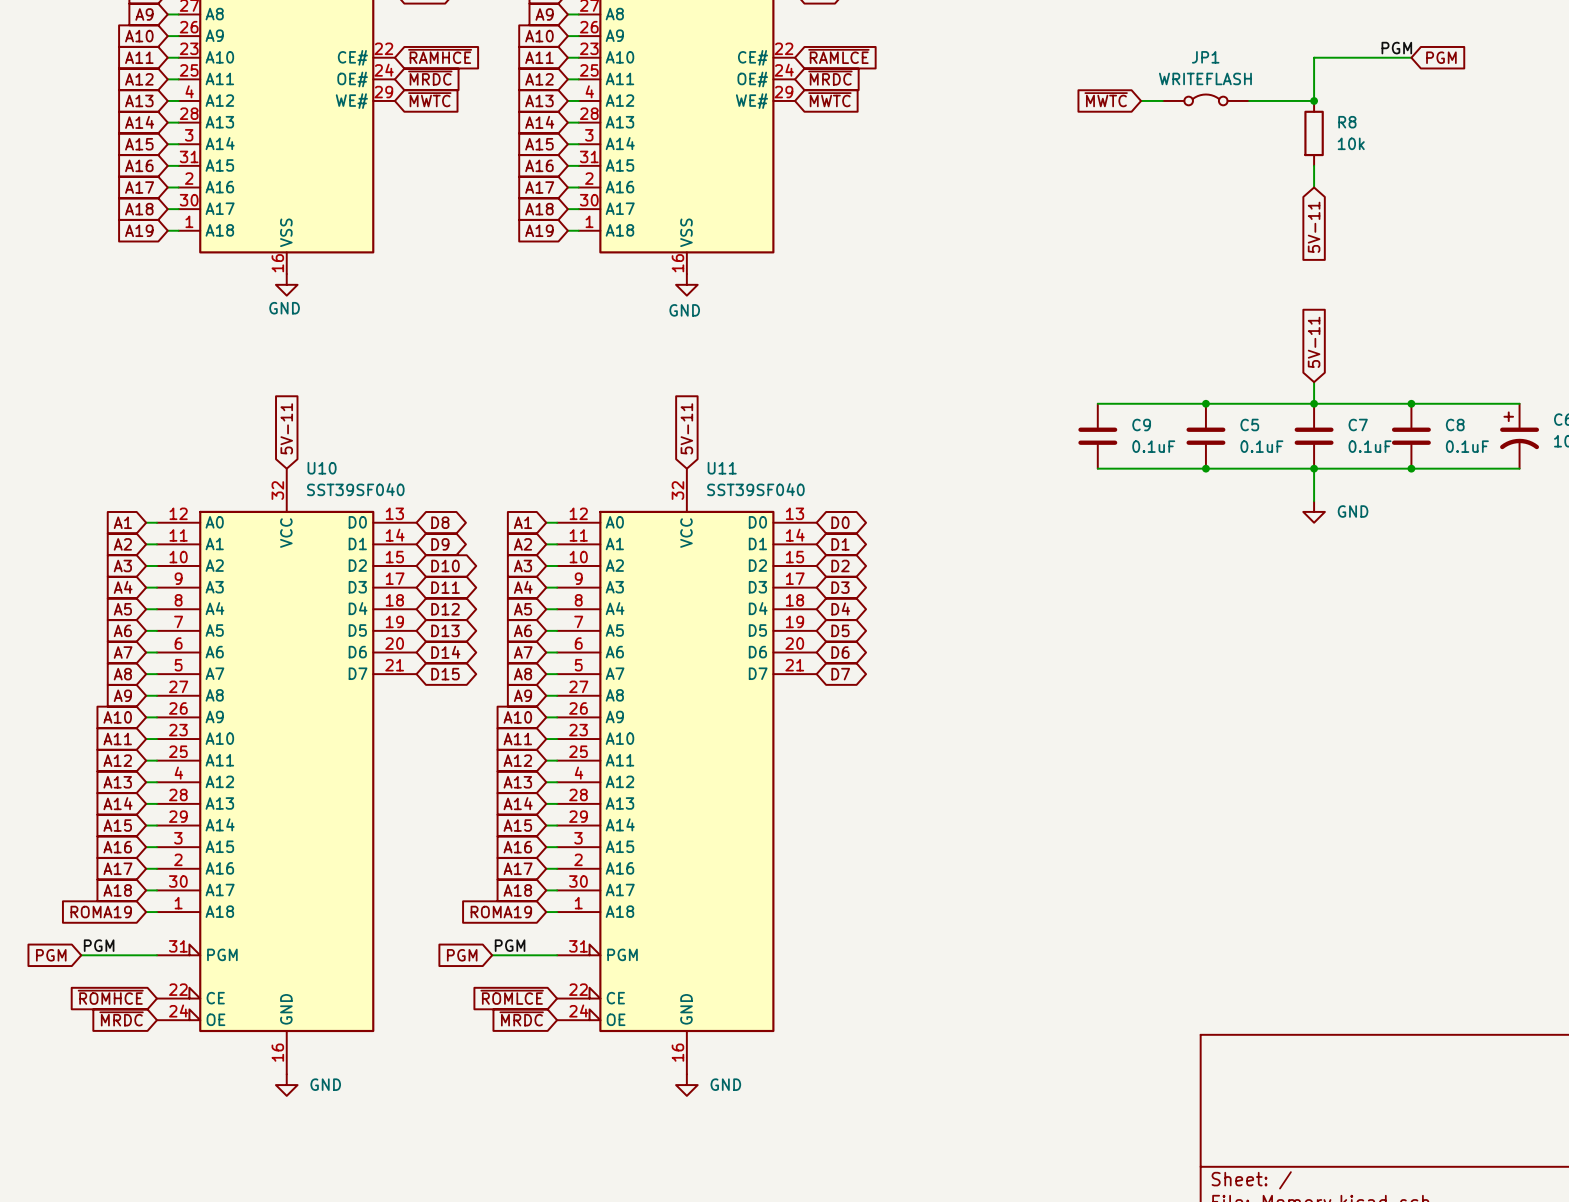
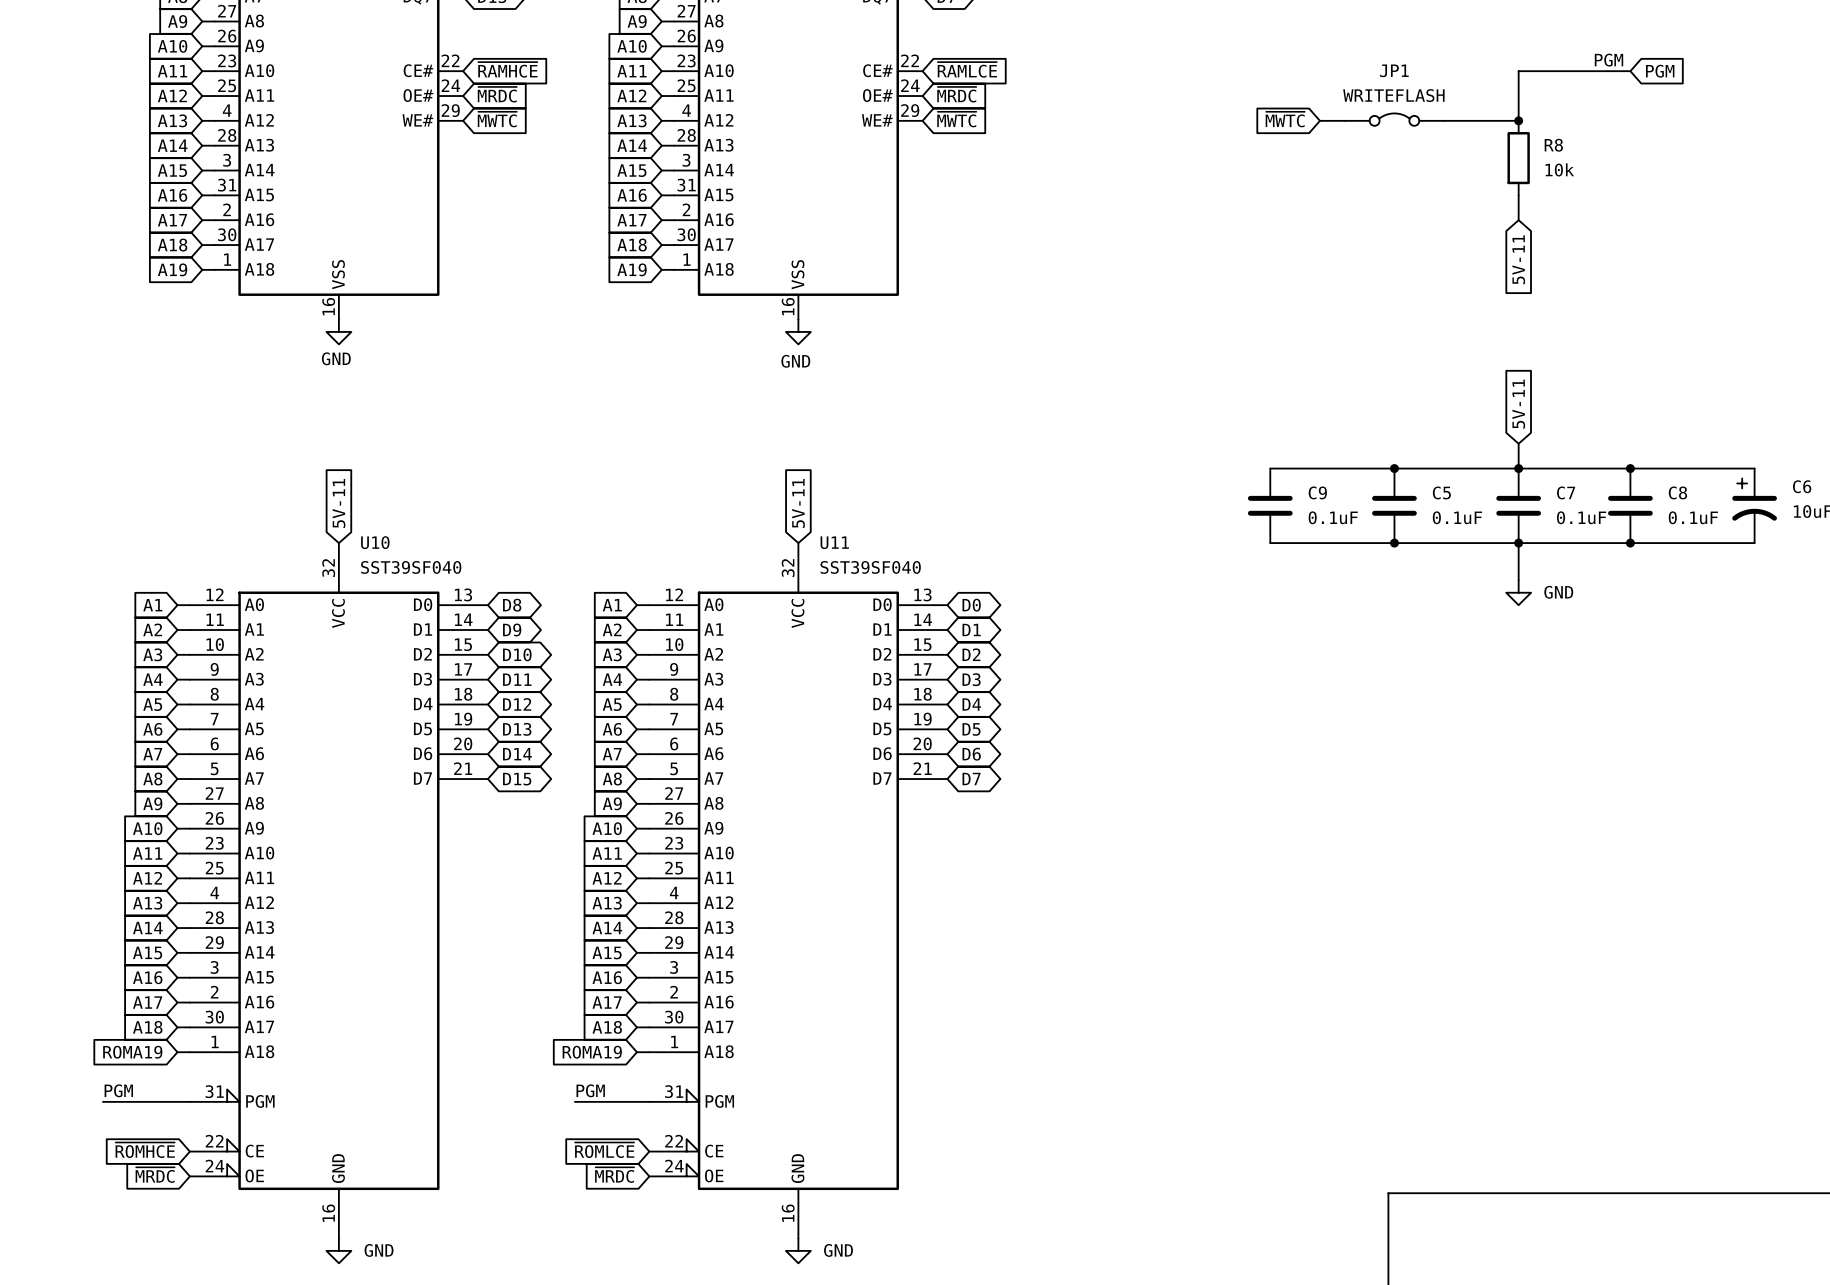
global label: PGM (51, 955) -> none
global label: PGM (462, 955) -> none

